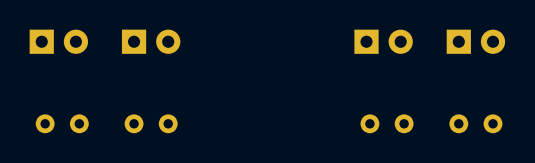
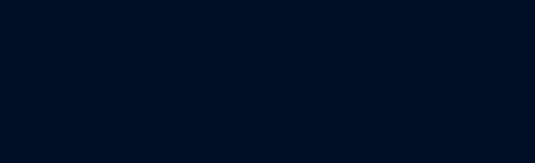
part: (58, 41) -> none
part: (151, 41) -> none
part: (383, 41) -> none
part: (475, 41) -> none
part: (62, 123) -> none
part: (151, 123) -> none
part: (387, 123) -> none
part: (475, 123) -> none

